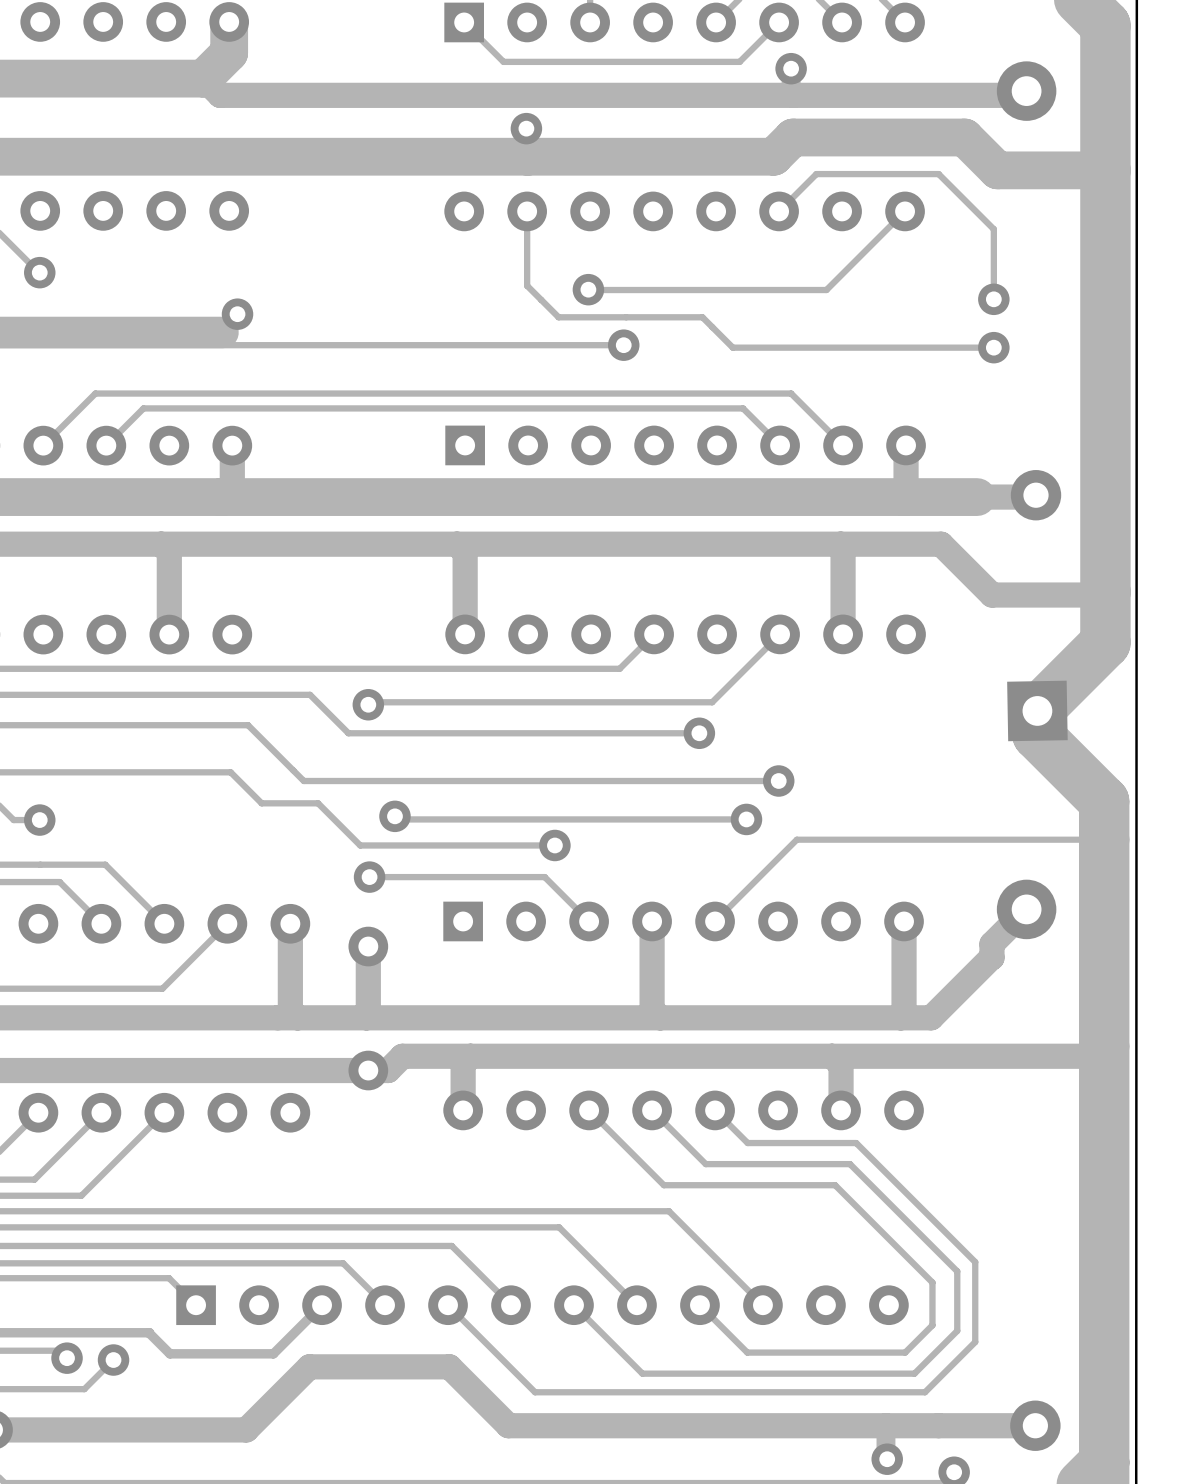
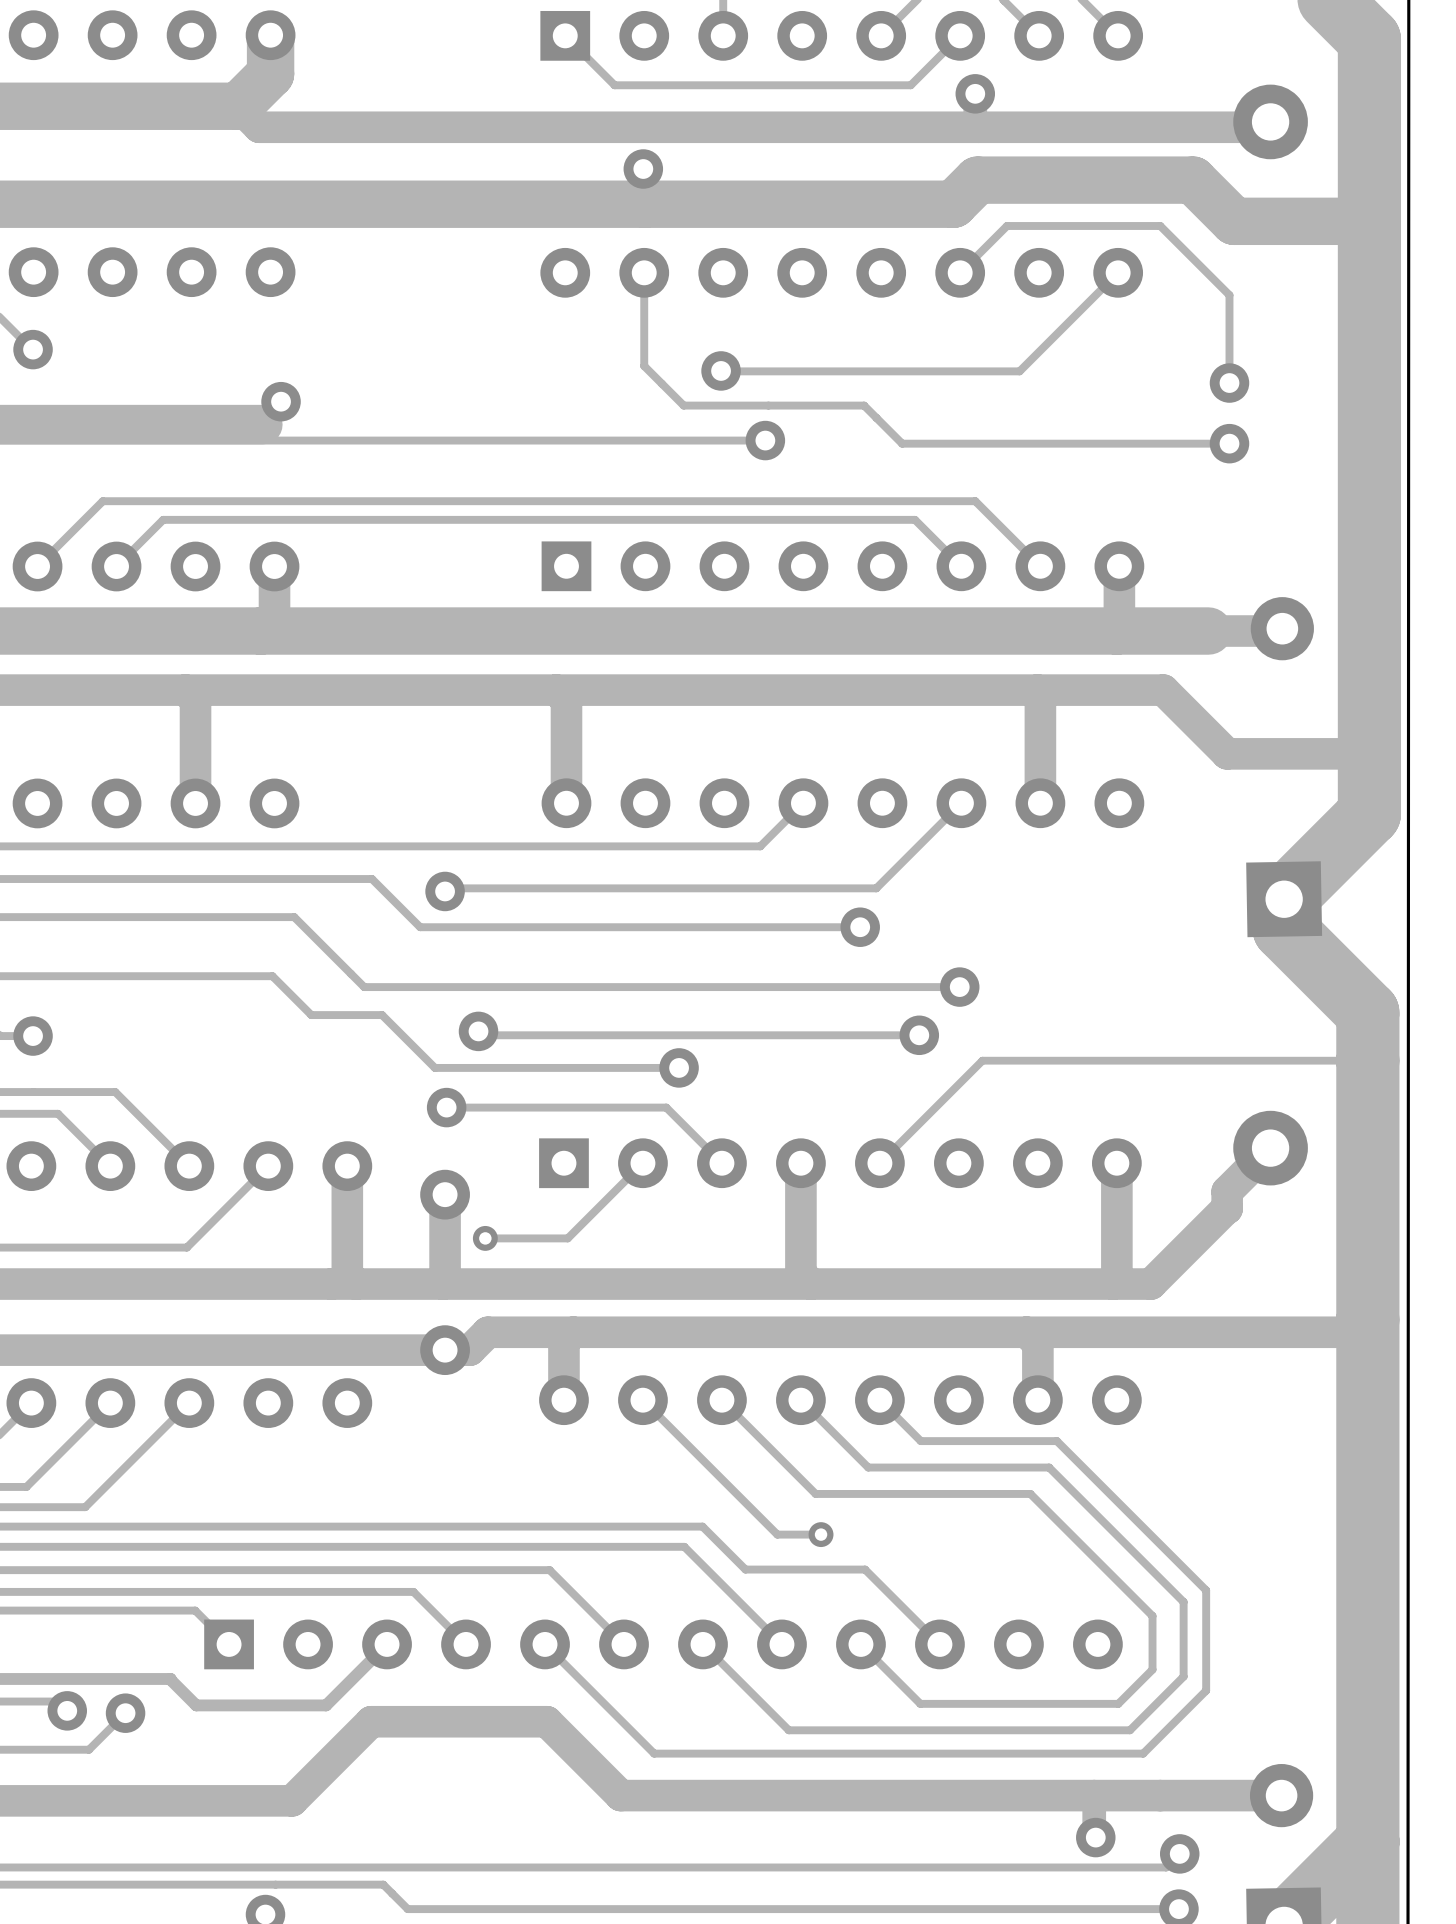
track: none -> (642, 1163) (567, 1238) (485, 1238)
via: none -> (485, 1238)
track: none -> (642, 1400) (777, 1534) (821, 1534)
track: (573, 1211) (668, 1211) (703, 1245) -> (702, 1526) (745, 1569) (865, 1569)
via: none -> (821, 1534)

